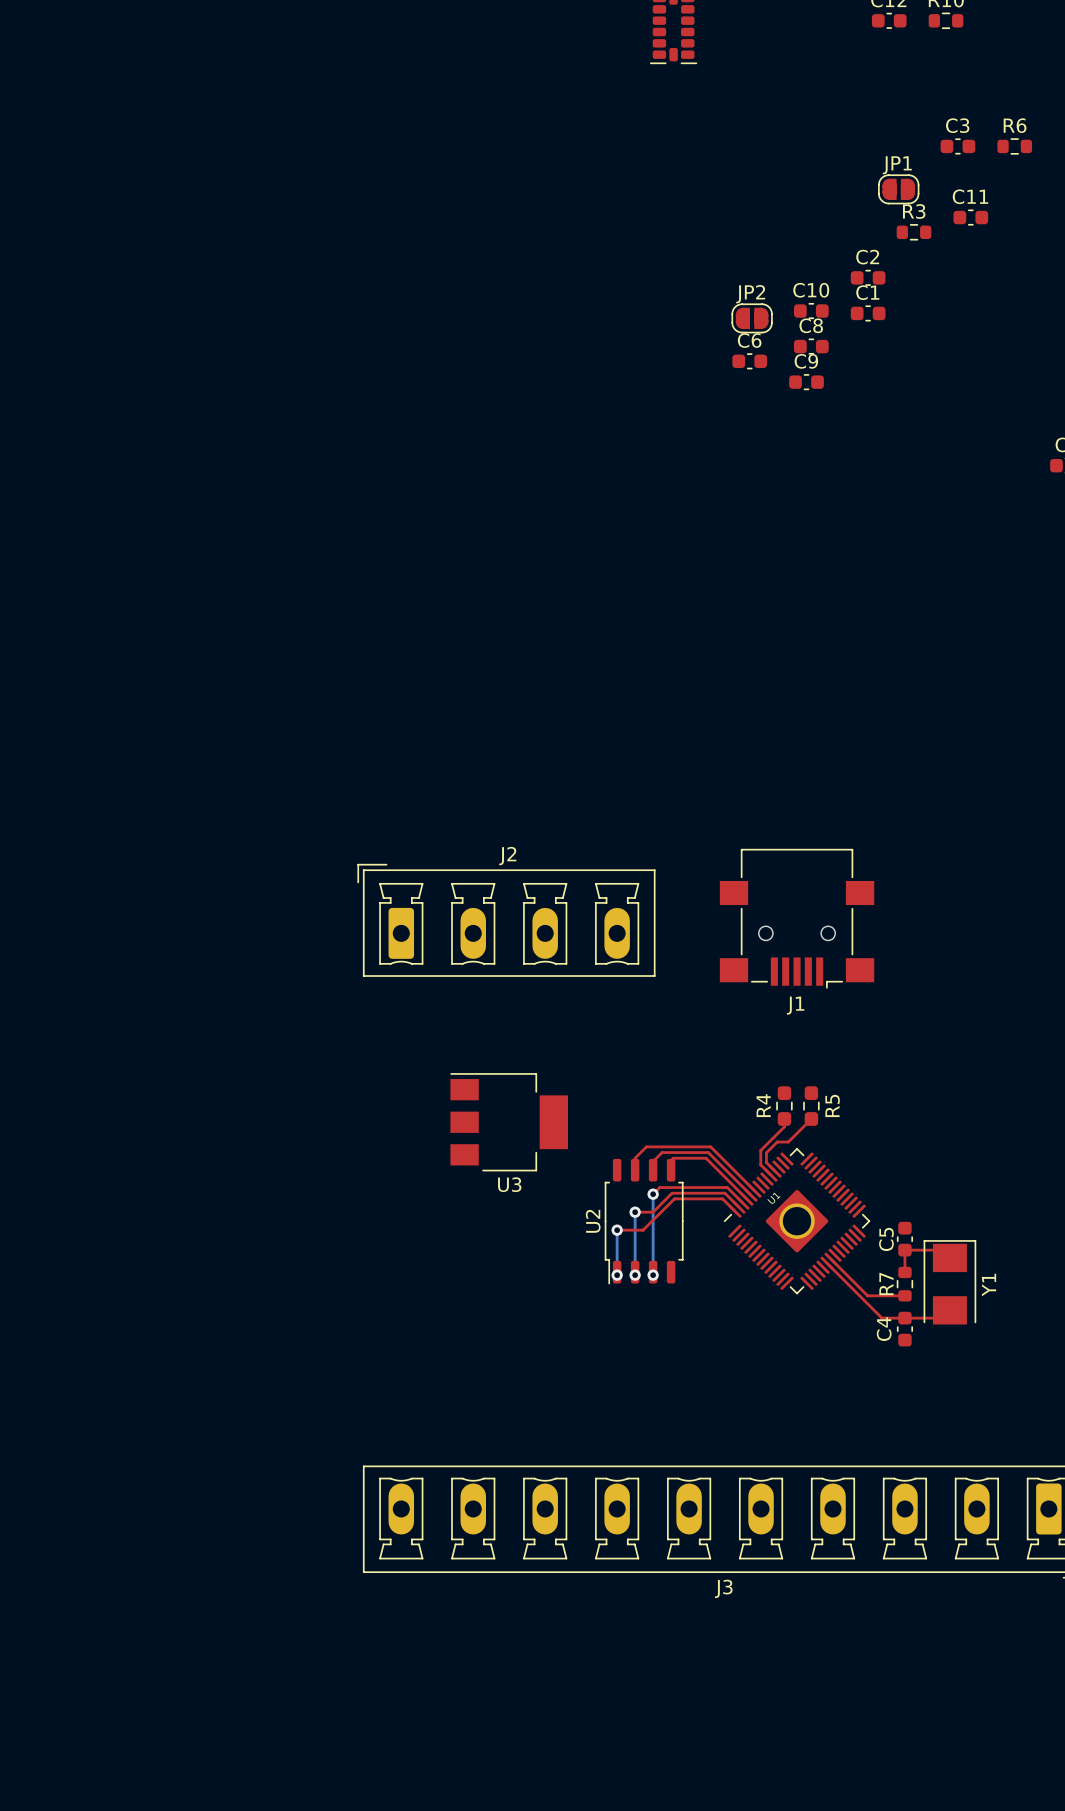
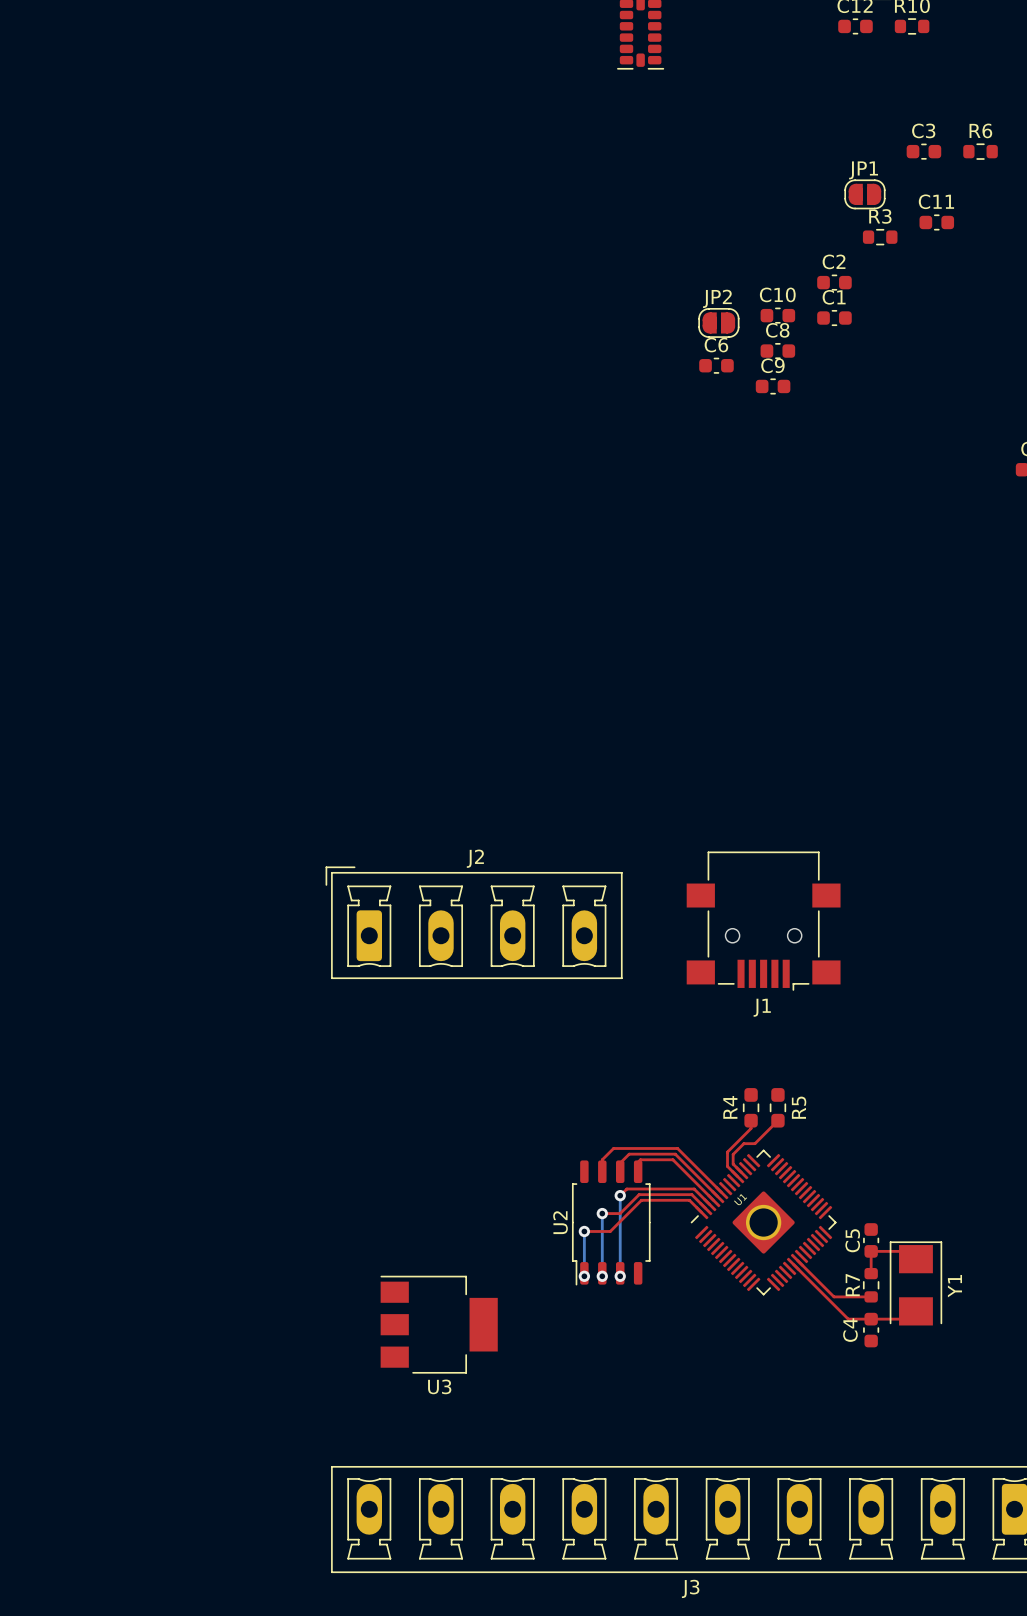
U3 position: (509, 1122) -> (439, 1324)

